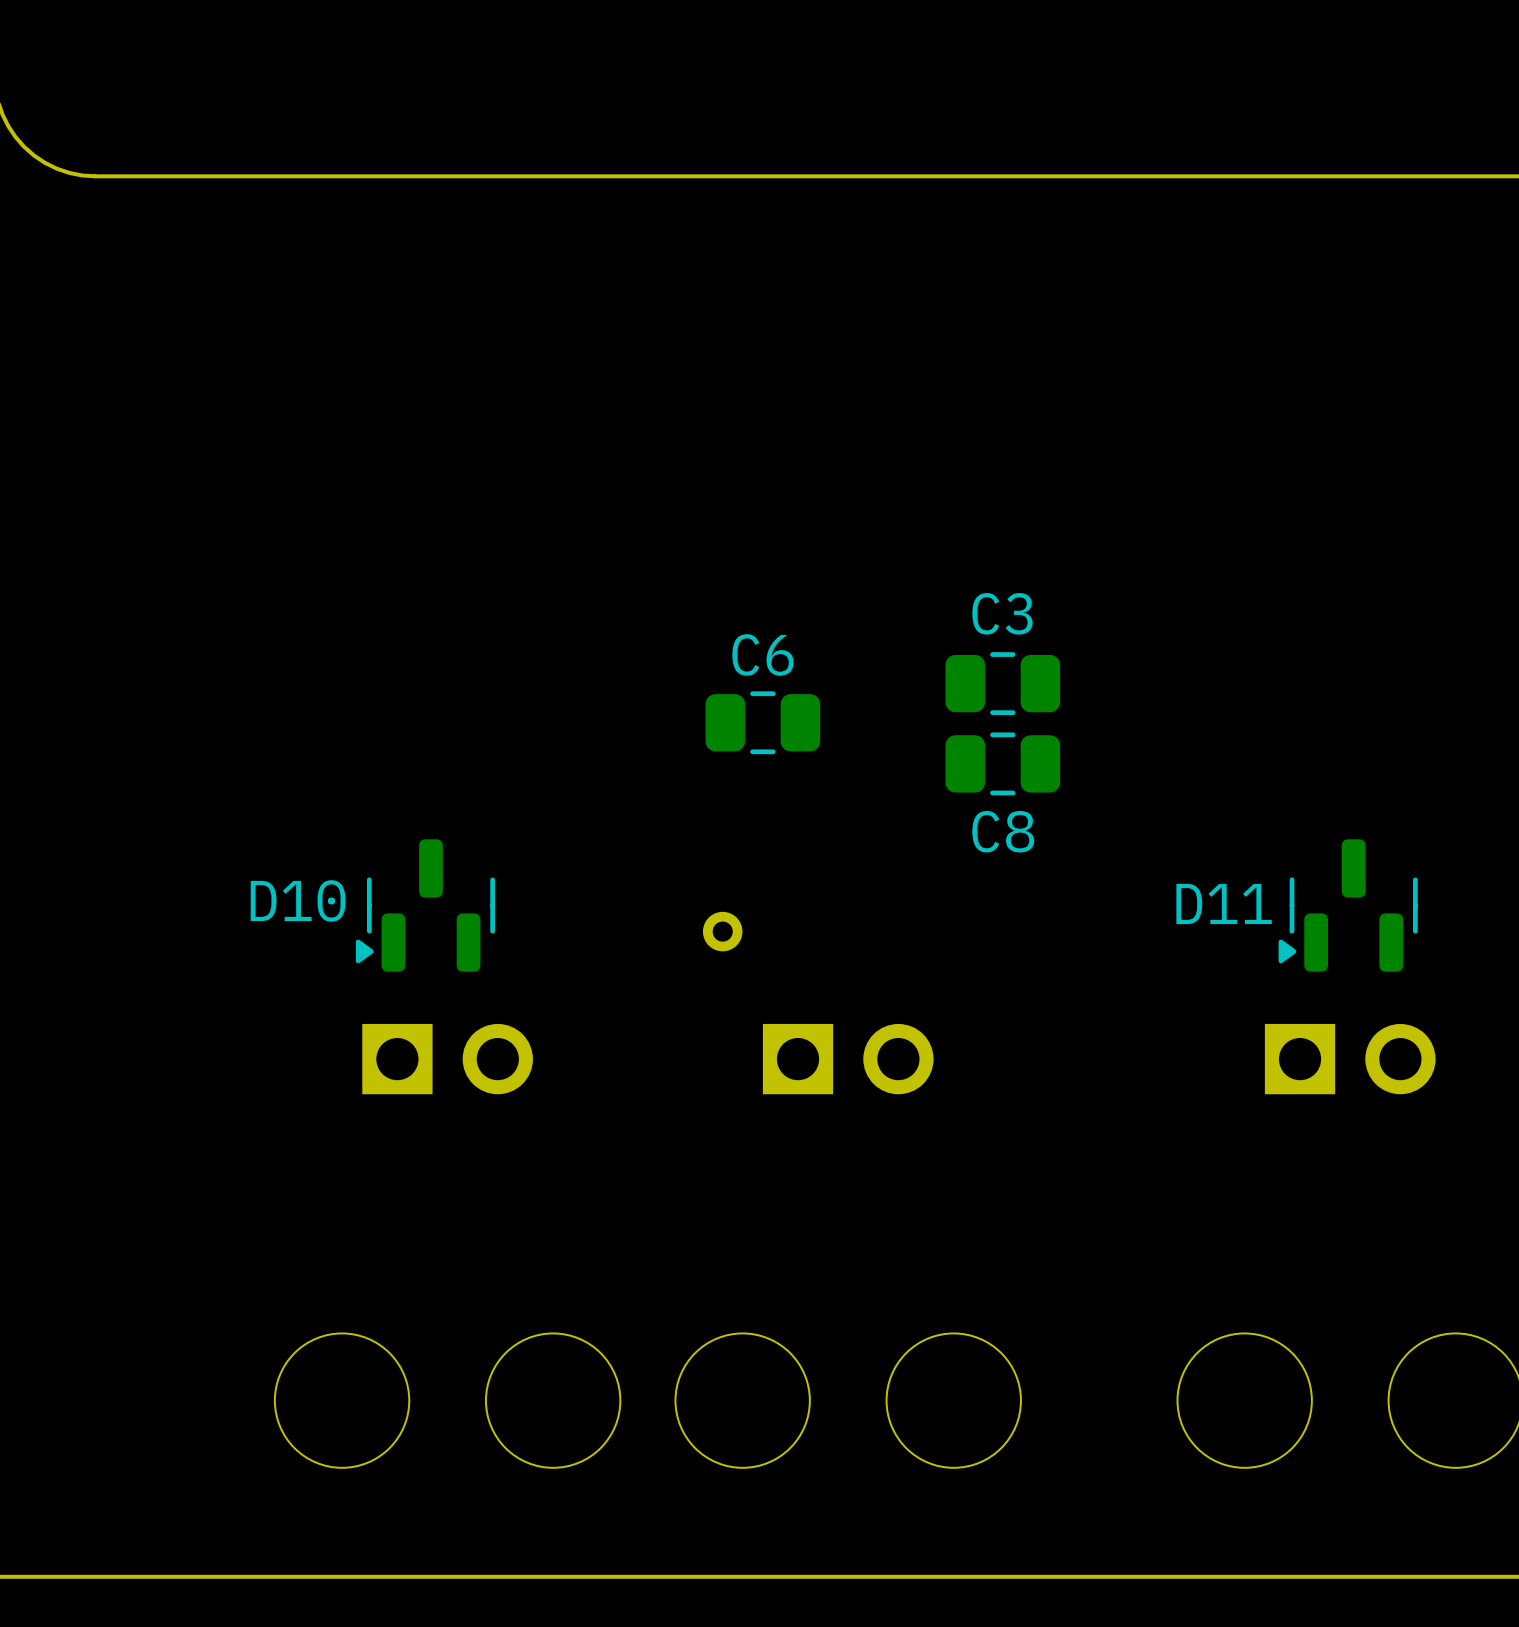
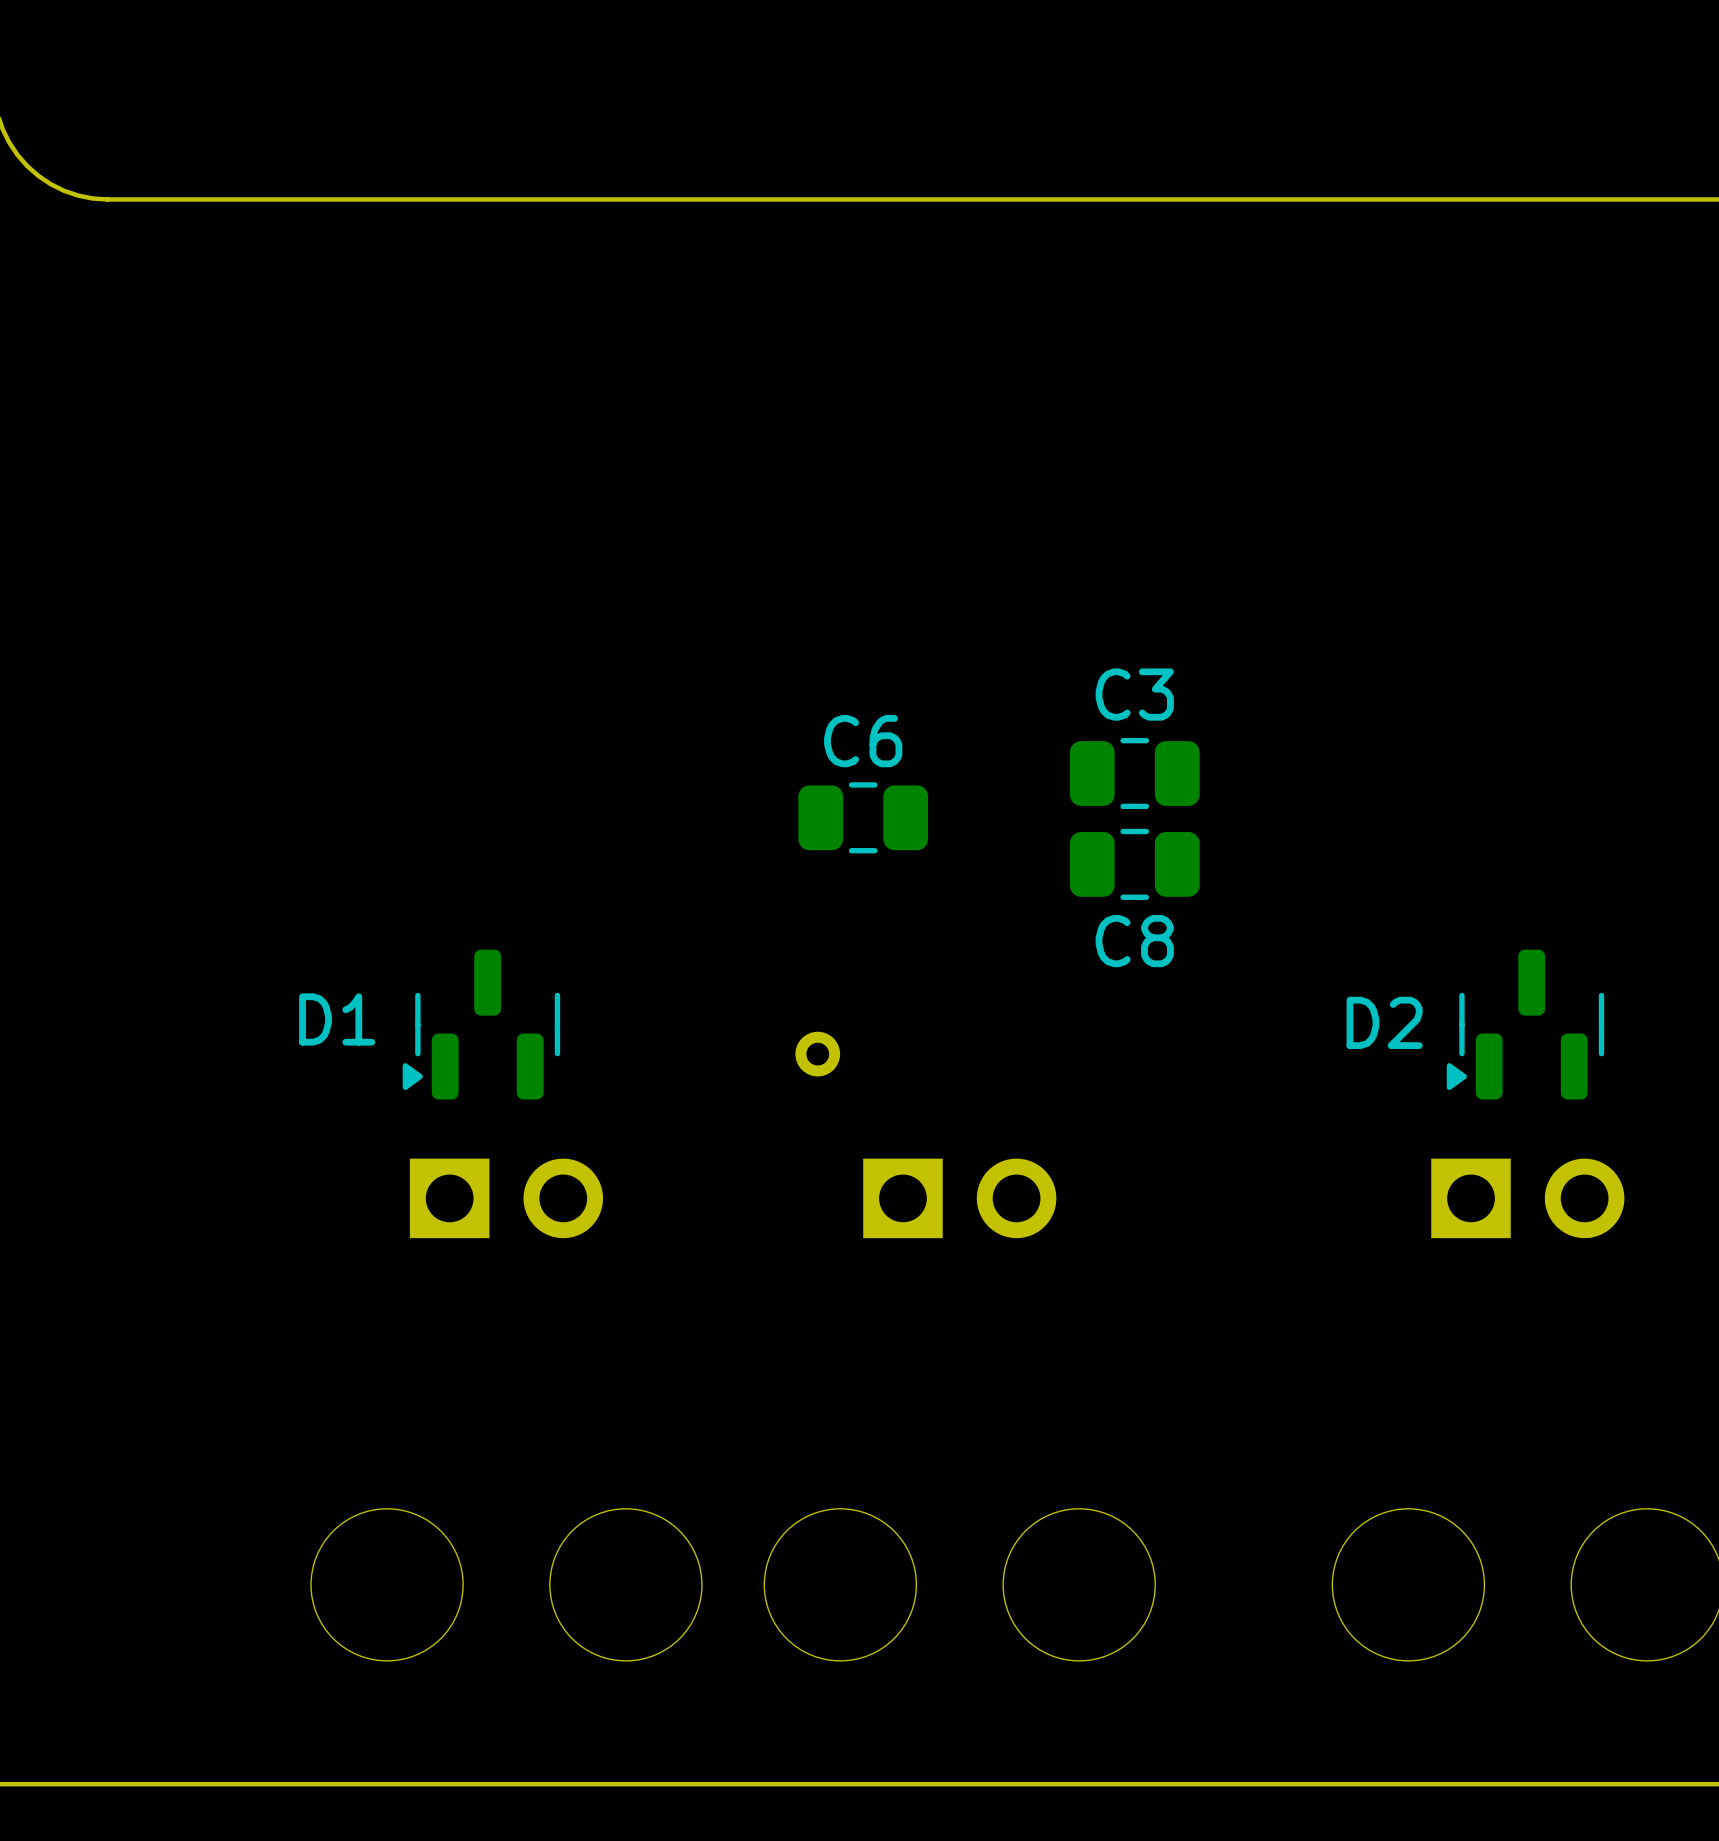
D10 name: D10 (298, 900) -> D1 (337, 1019)
D11 name: D11 (1224, 903) -> D2 (1384, 1022)

